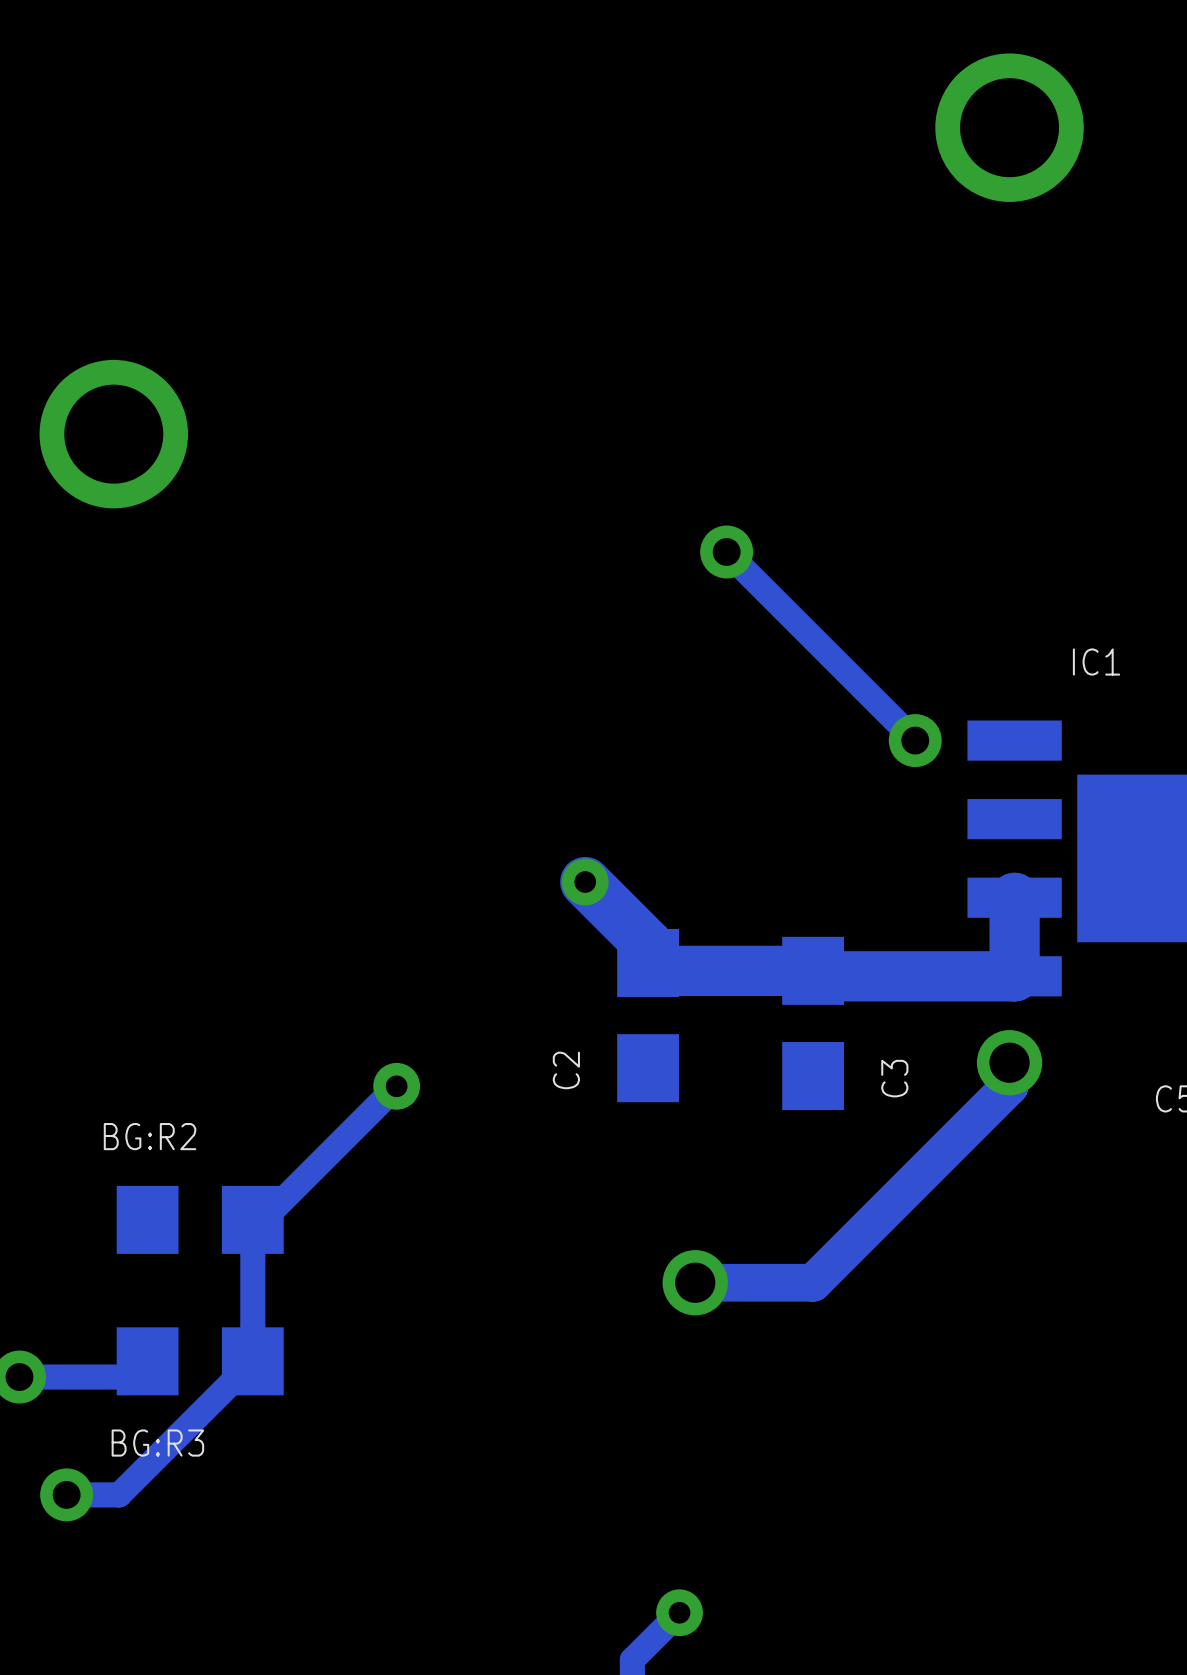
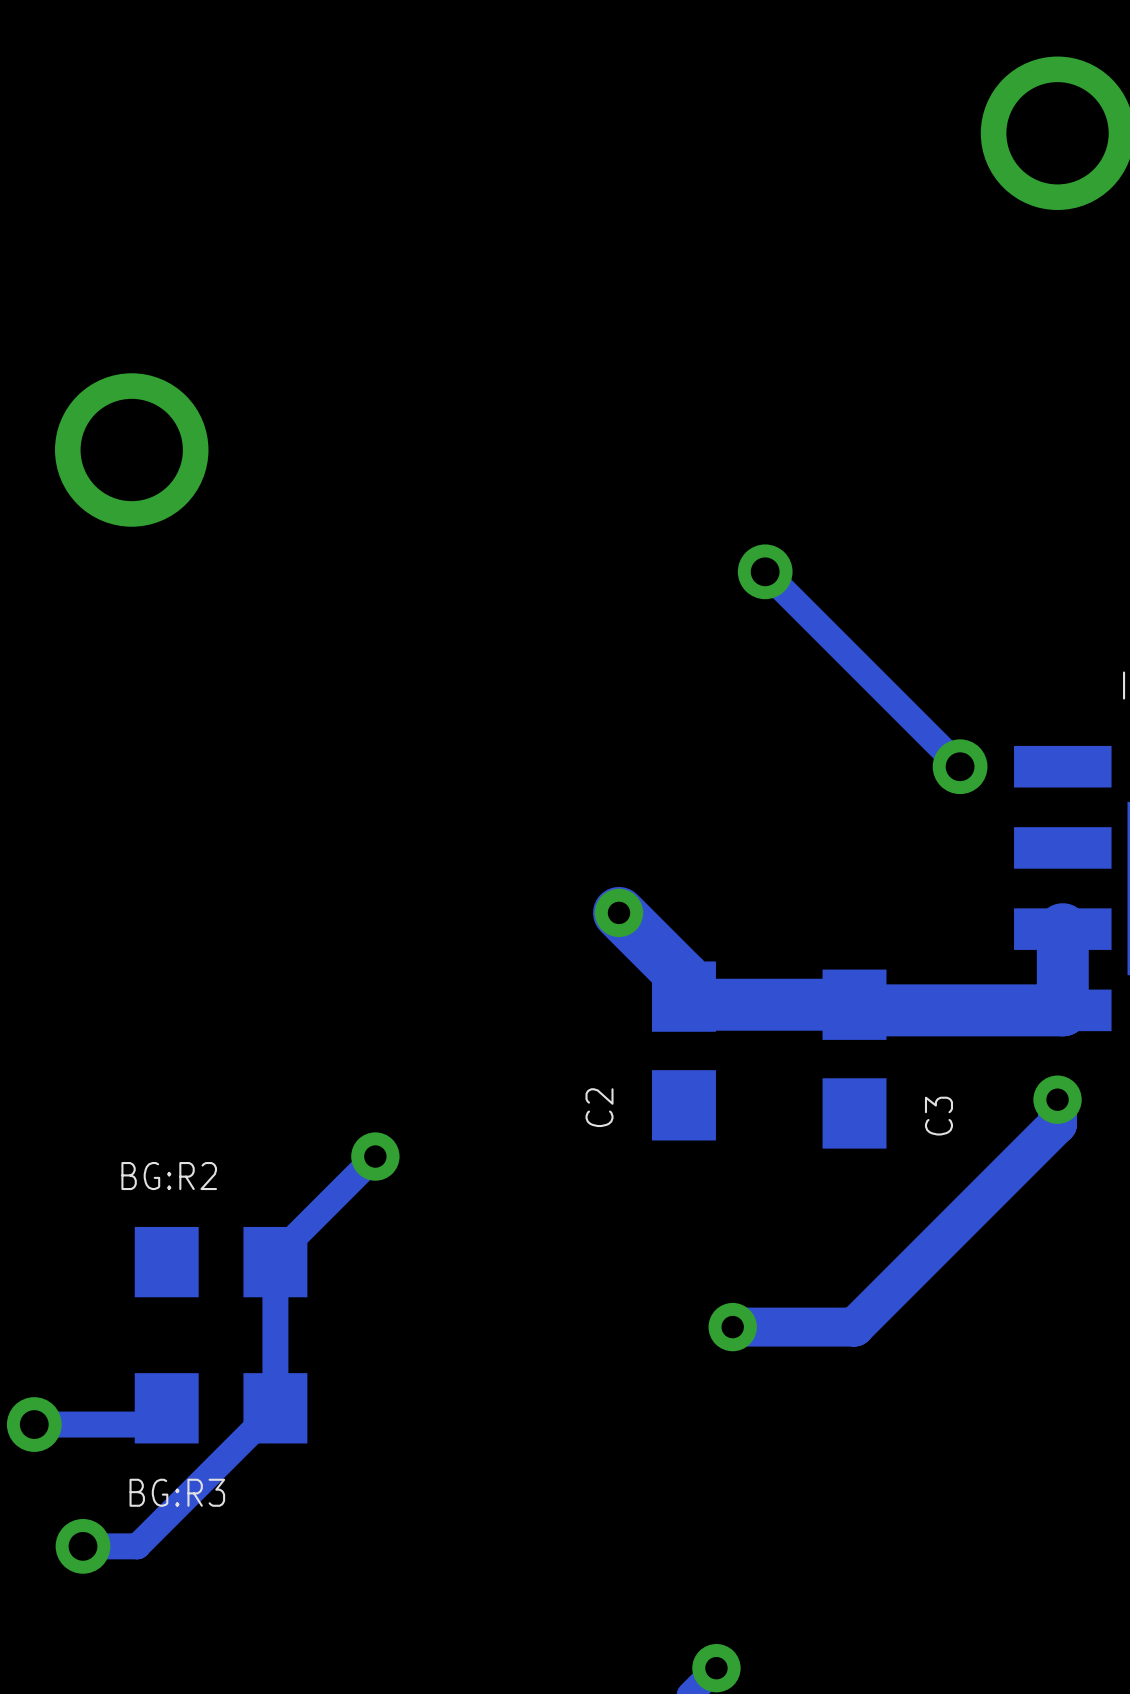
via size: [976, 1030, 1043, 1096] -> [1033, 1075, 1082, 1124]
track: (396, 1086) (263, 1219) (252, 1219) -> (375, 1156) (275, 1256) (275, 1262)
via position: (396, 1086) -> (375, 1156)
via size: [662, 1250, 728, 1316] -> [708, 1302, 757, 1352]

